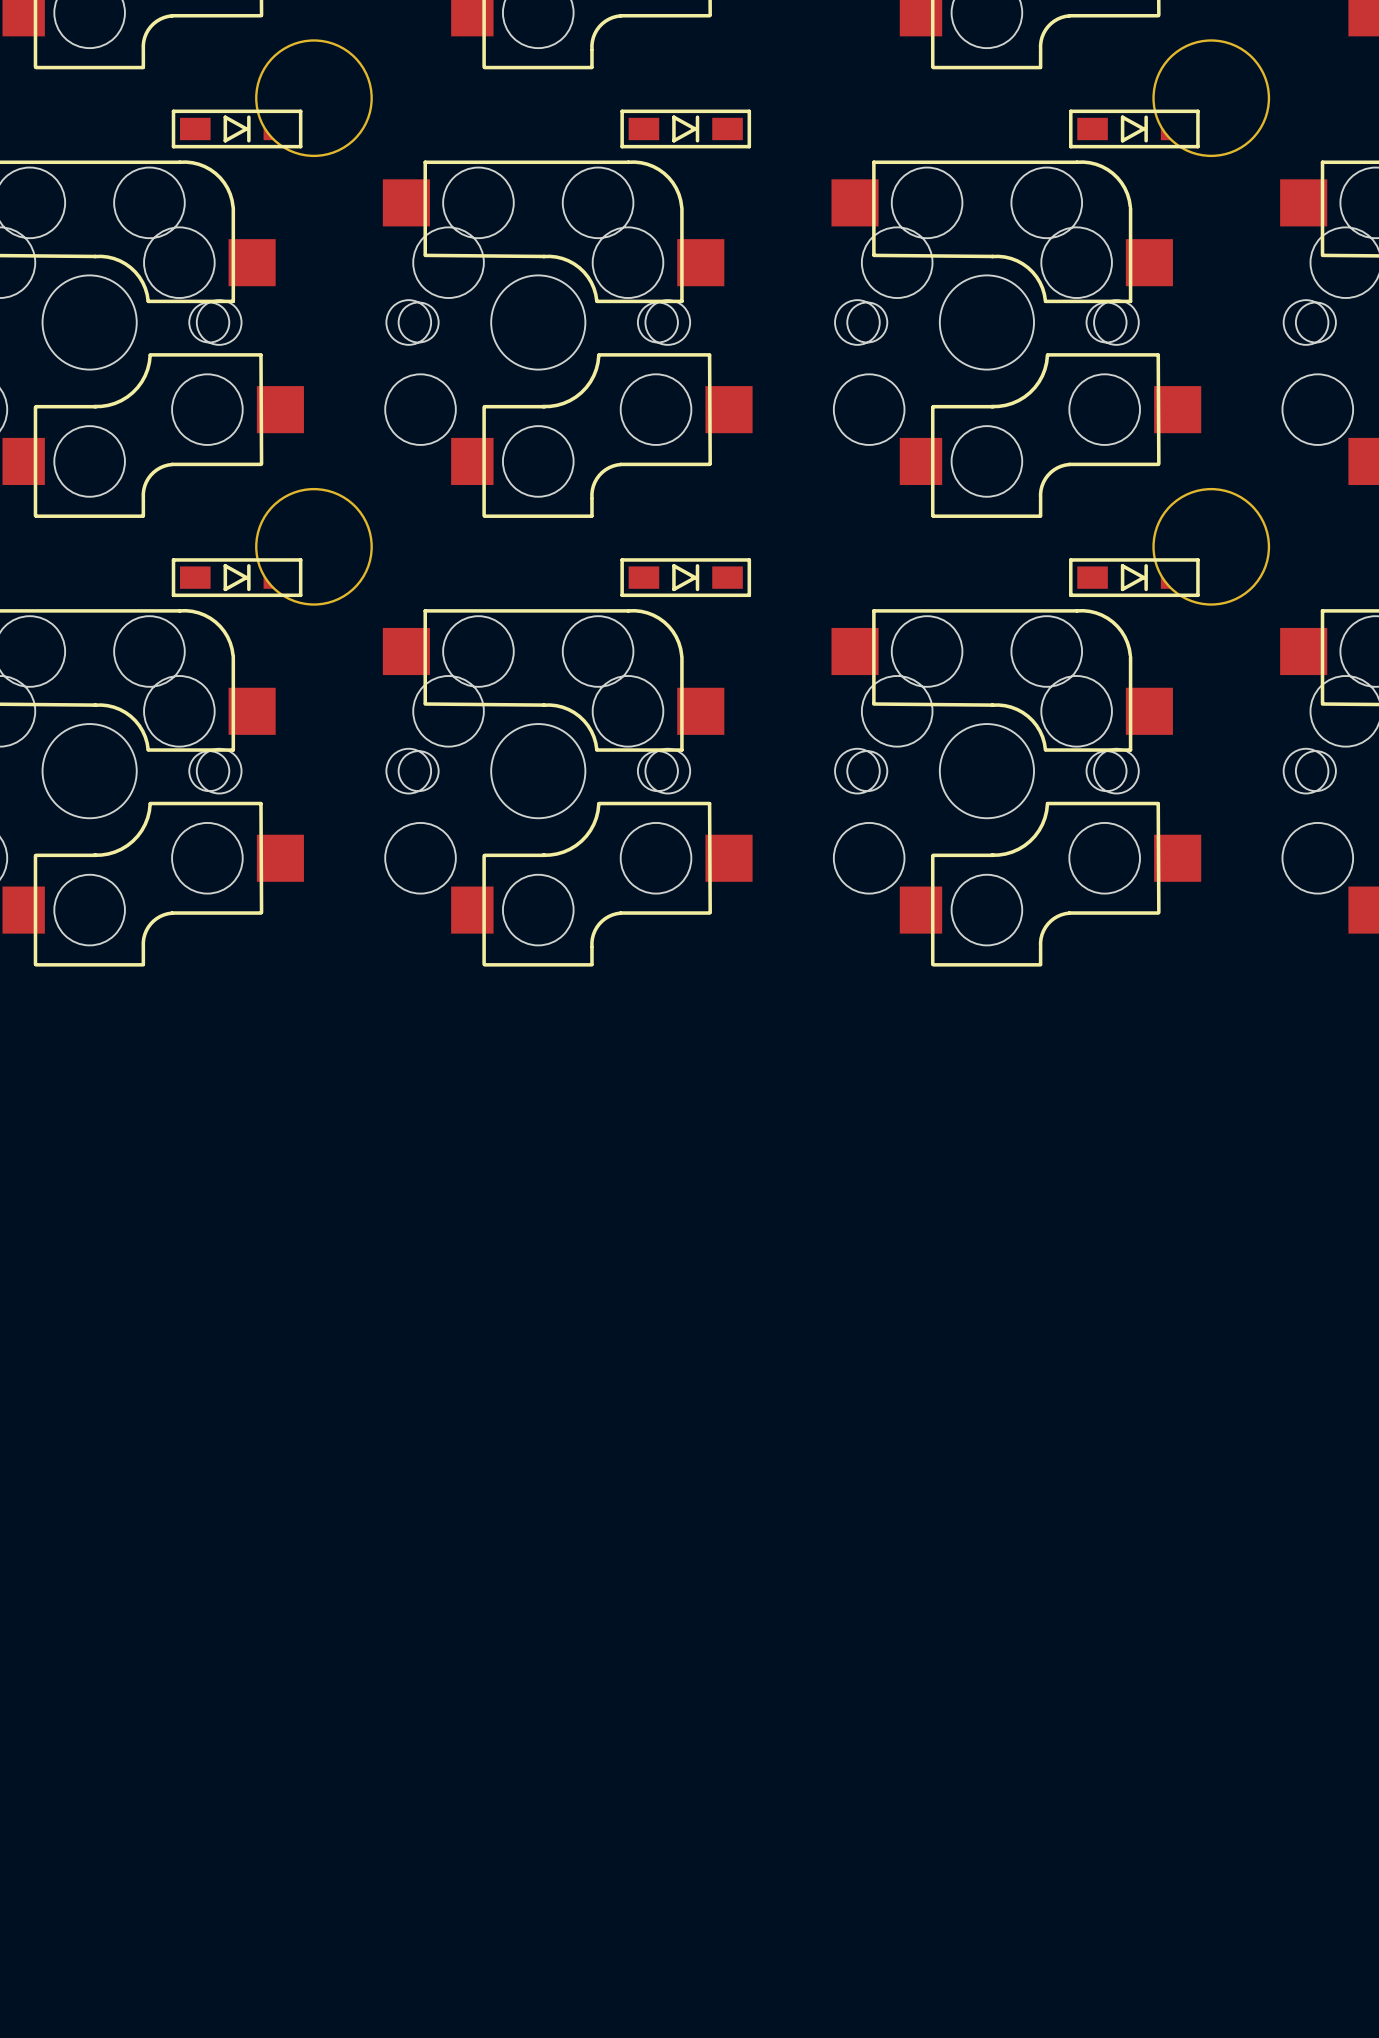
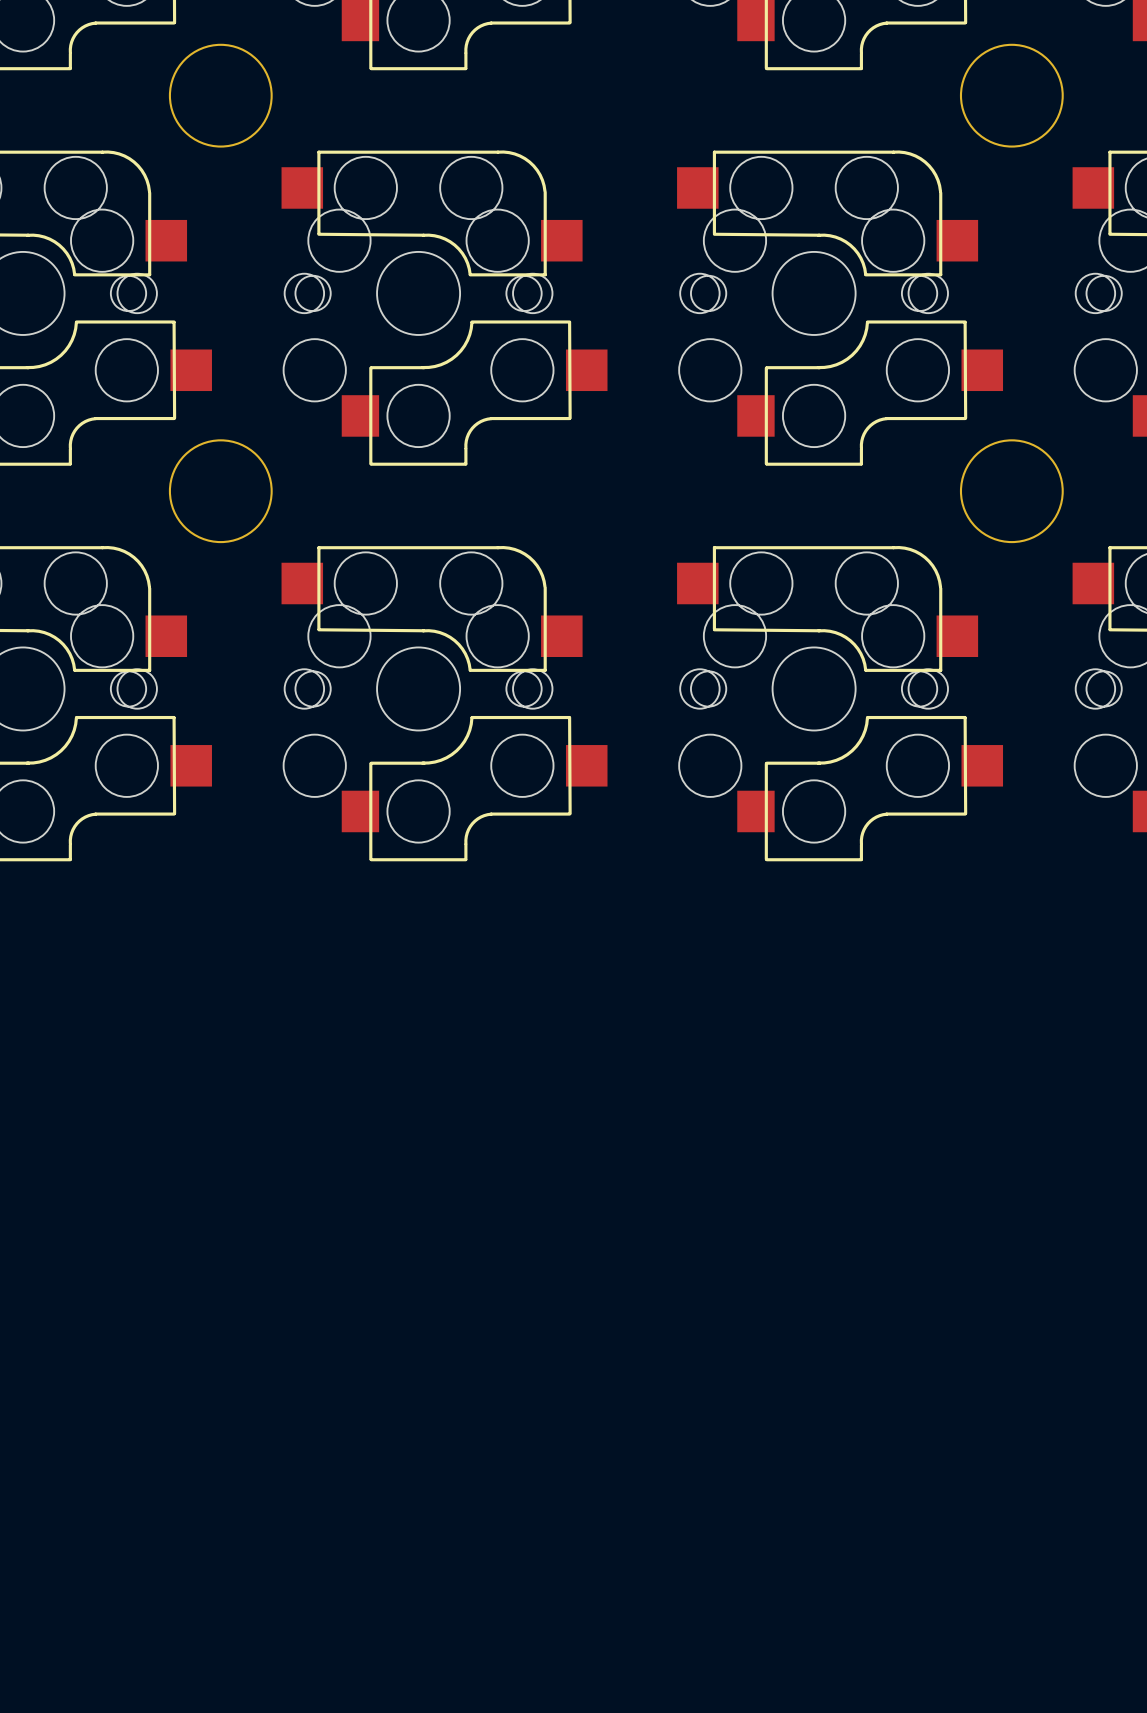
part: (237, 128) -> none
part: (685, 128) -> none
part: (1134, 128) -> none
part: (237, 577) -> none
part: (685, 577) -> none
part: (1134, 577) -> none

